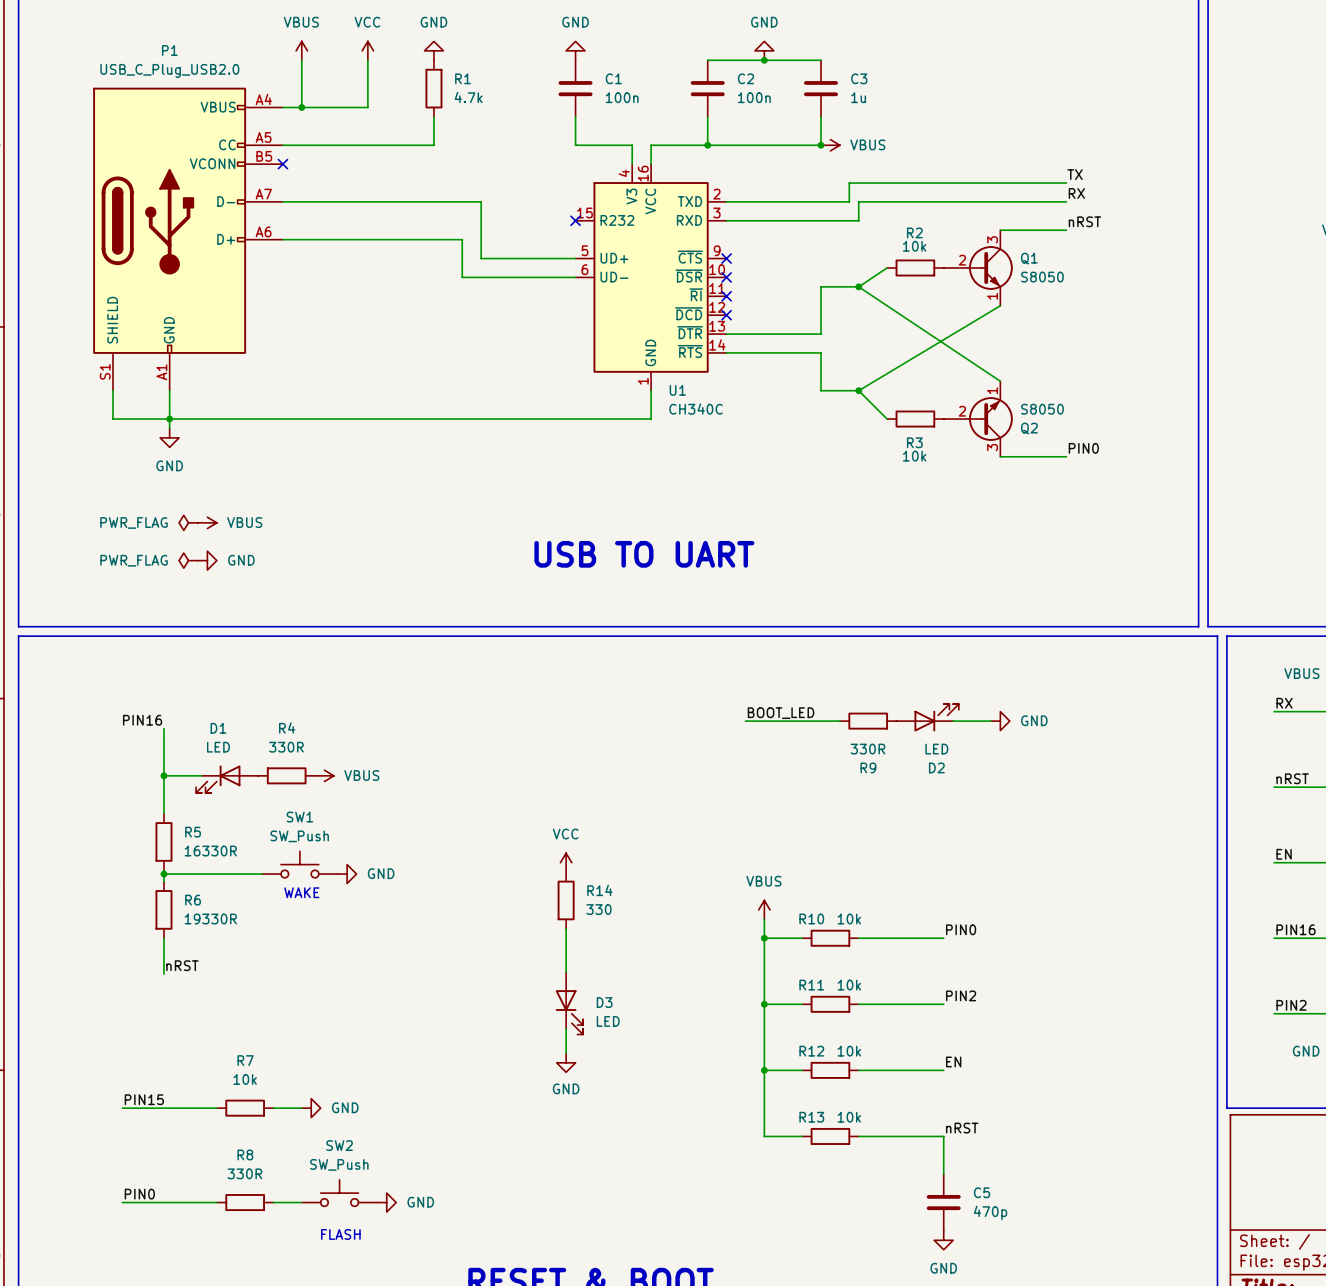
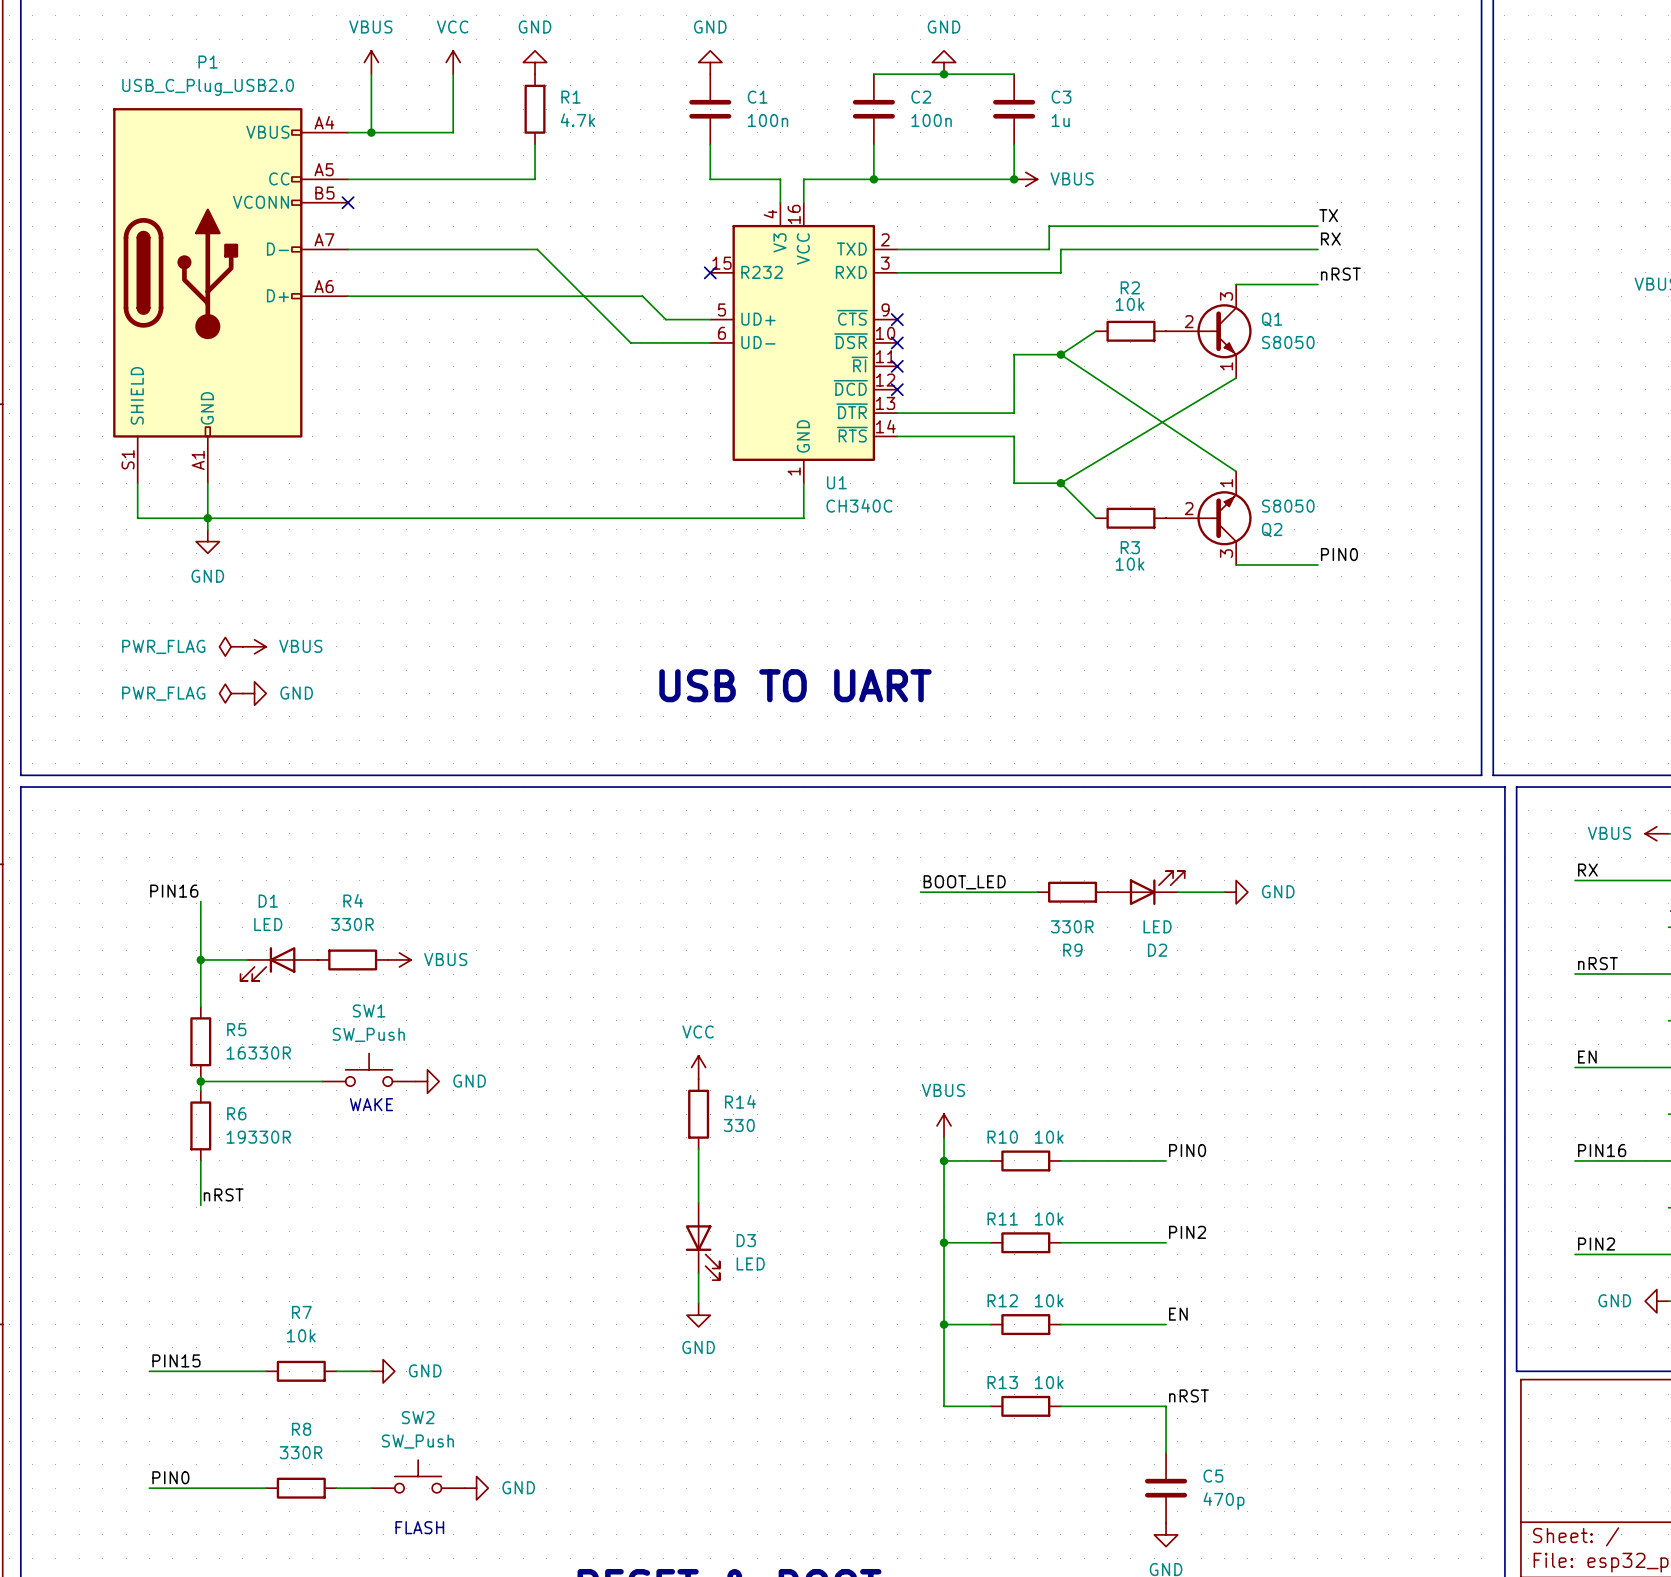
wire: (435, 201) (481, 201) (481, 258) (539, 258) -> (537, 249) (630, 342)
wire: (462, 239) (462, 277) (511, 277) -> (570, 296) (642, 296) (665, 319)

